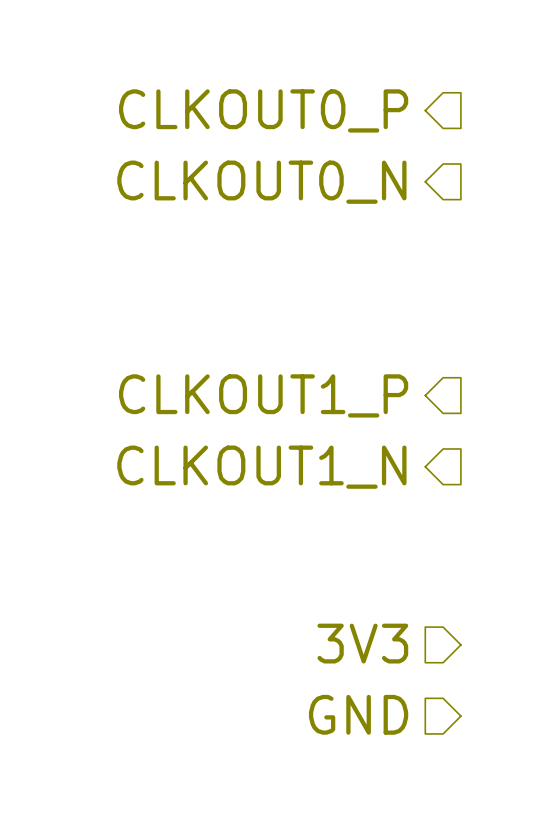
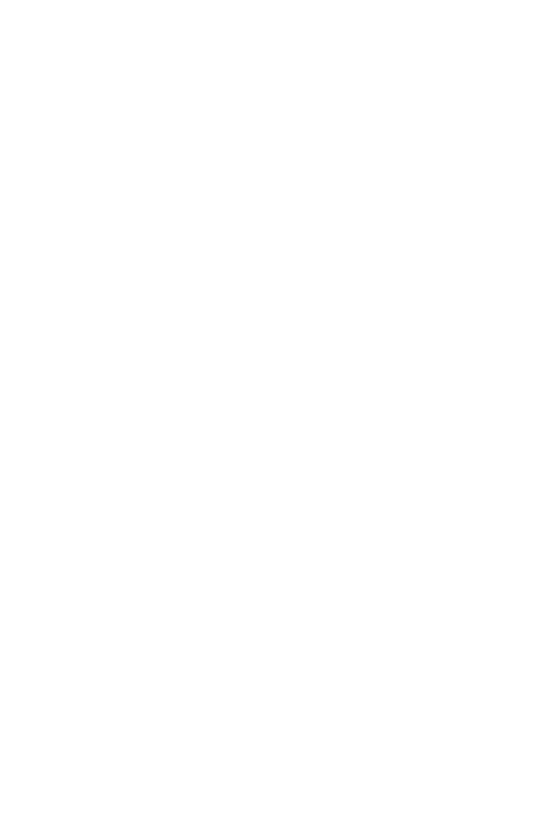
hierarchical label: CLKOUT0_P (263, 110) -> none
hierarchical label: CLKOUT0_N (261, 182) -> none
hierarchical label: CLKOUT1_P (263, 395) -> none
hierarchical label: CLKOUT1_N (261, 467) -> none
hierarchical label: 3V3 (362, 643) -> none
hierarchical label: GND (358, 714) -> none

